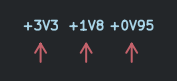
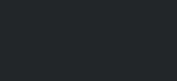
power symbol: +3V3 (40, 52) -> none
power symbol: +1V8 (86, 52) -> none
power symbol: +0V95 (131, 52) -> none

